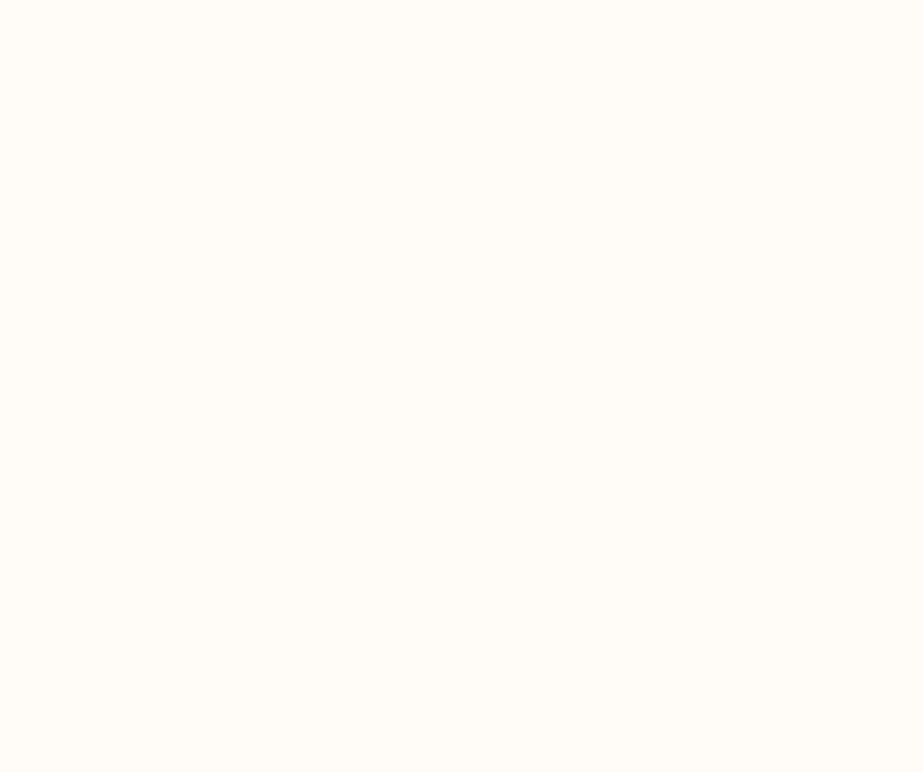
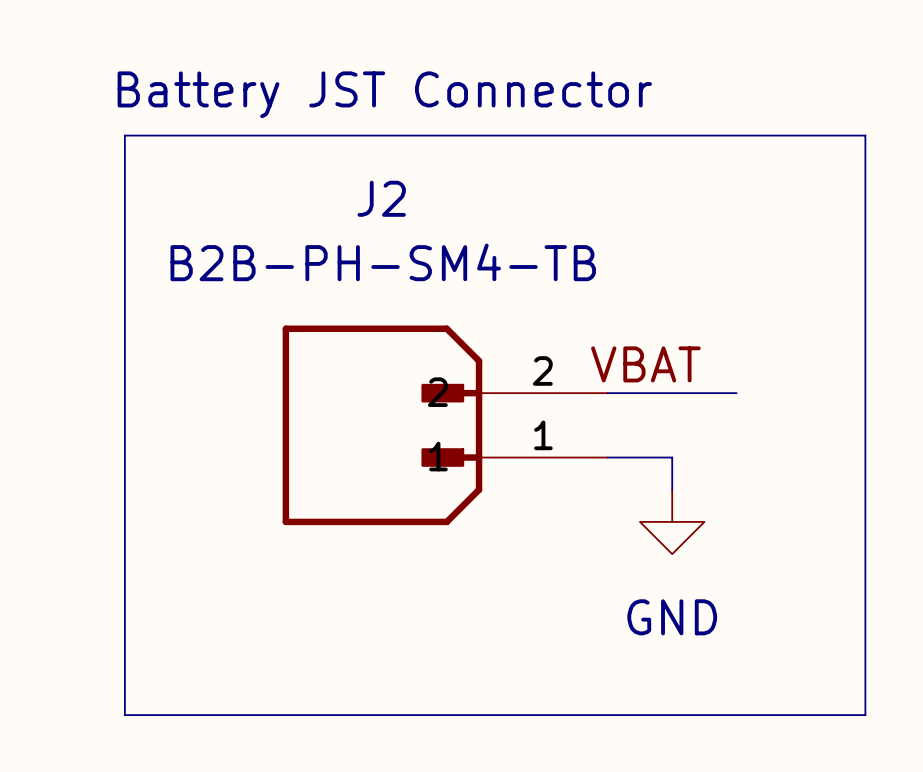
text: none -> Battery JST Connector (384, 94)
line: none -> (124, 135) (865, 135) (865, 715) (124, 715) (124, 135)
label: none -> VBAT (645, 364)
wire: none -> (607, 393) (736, 393)
J2: none -> B2B-PH-SM4-TB (445, 425)
wire: none -> (607, 457) (672, 457) (672, 489)
power symbol: none -> GND (672, 521)

